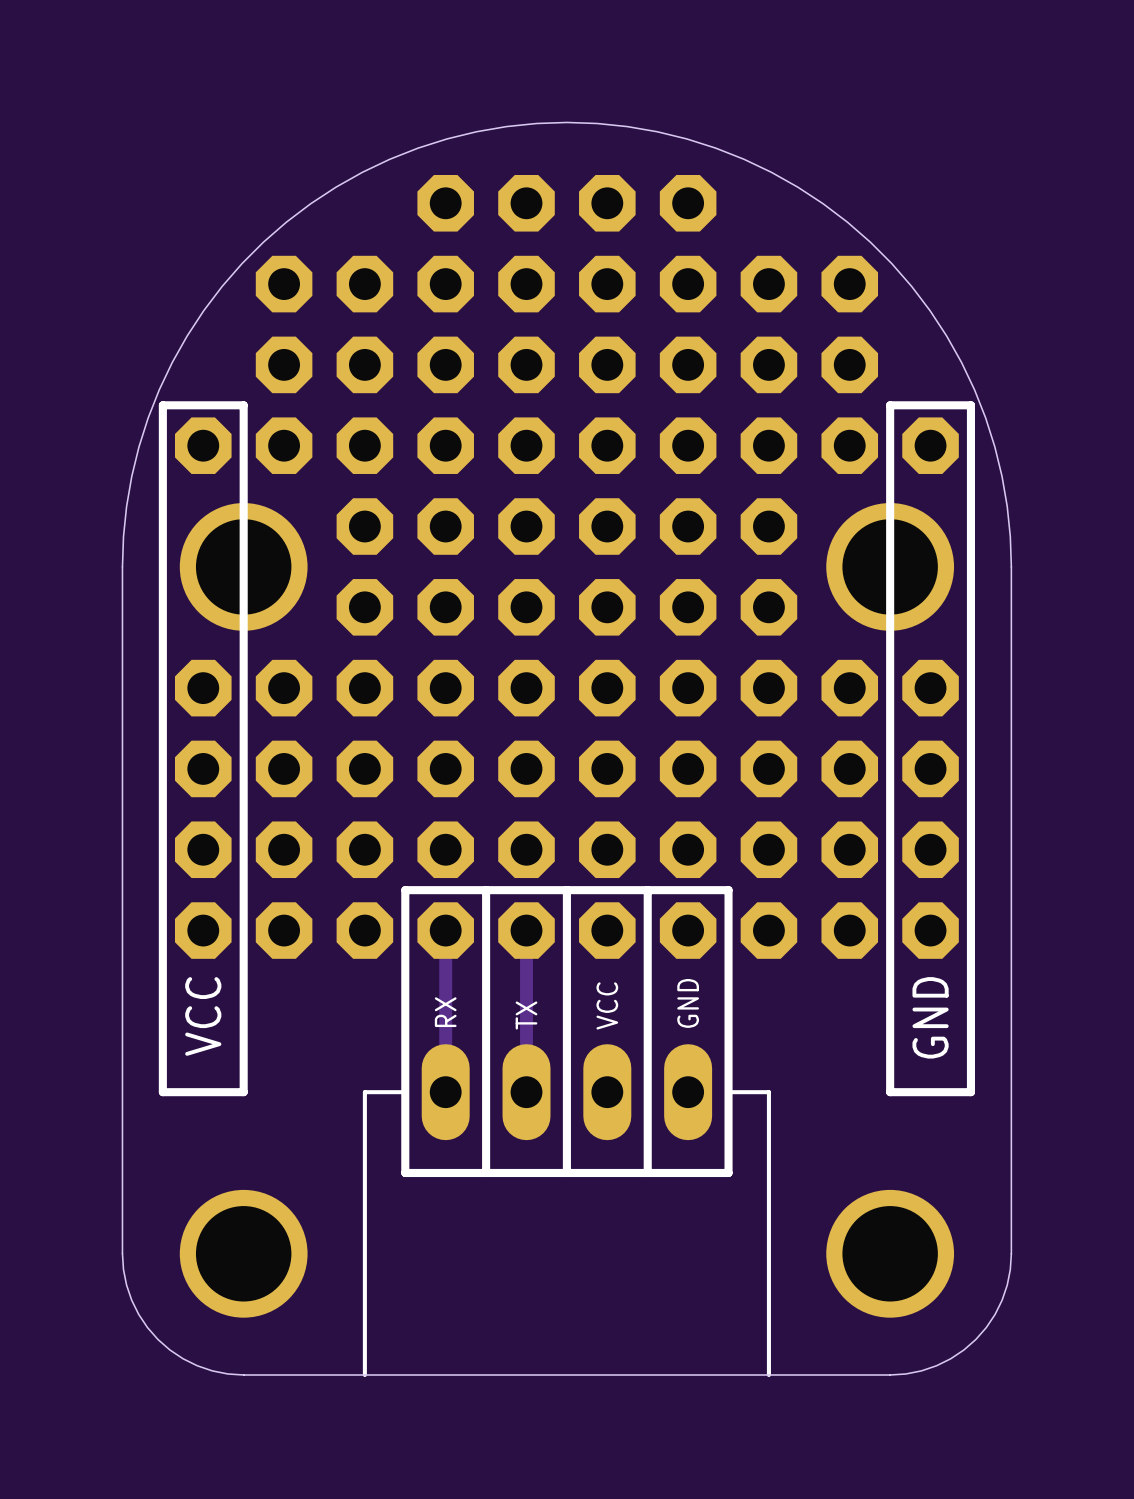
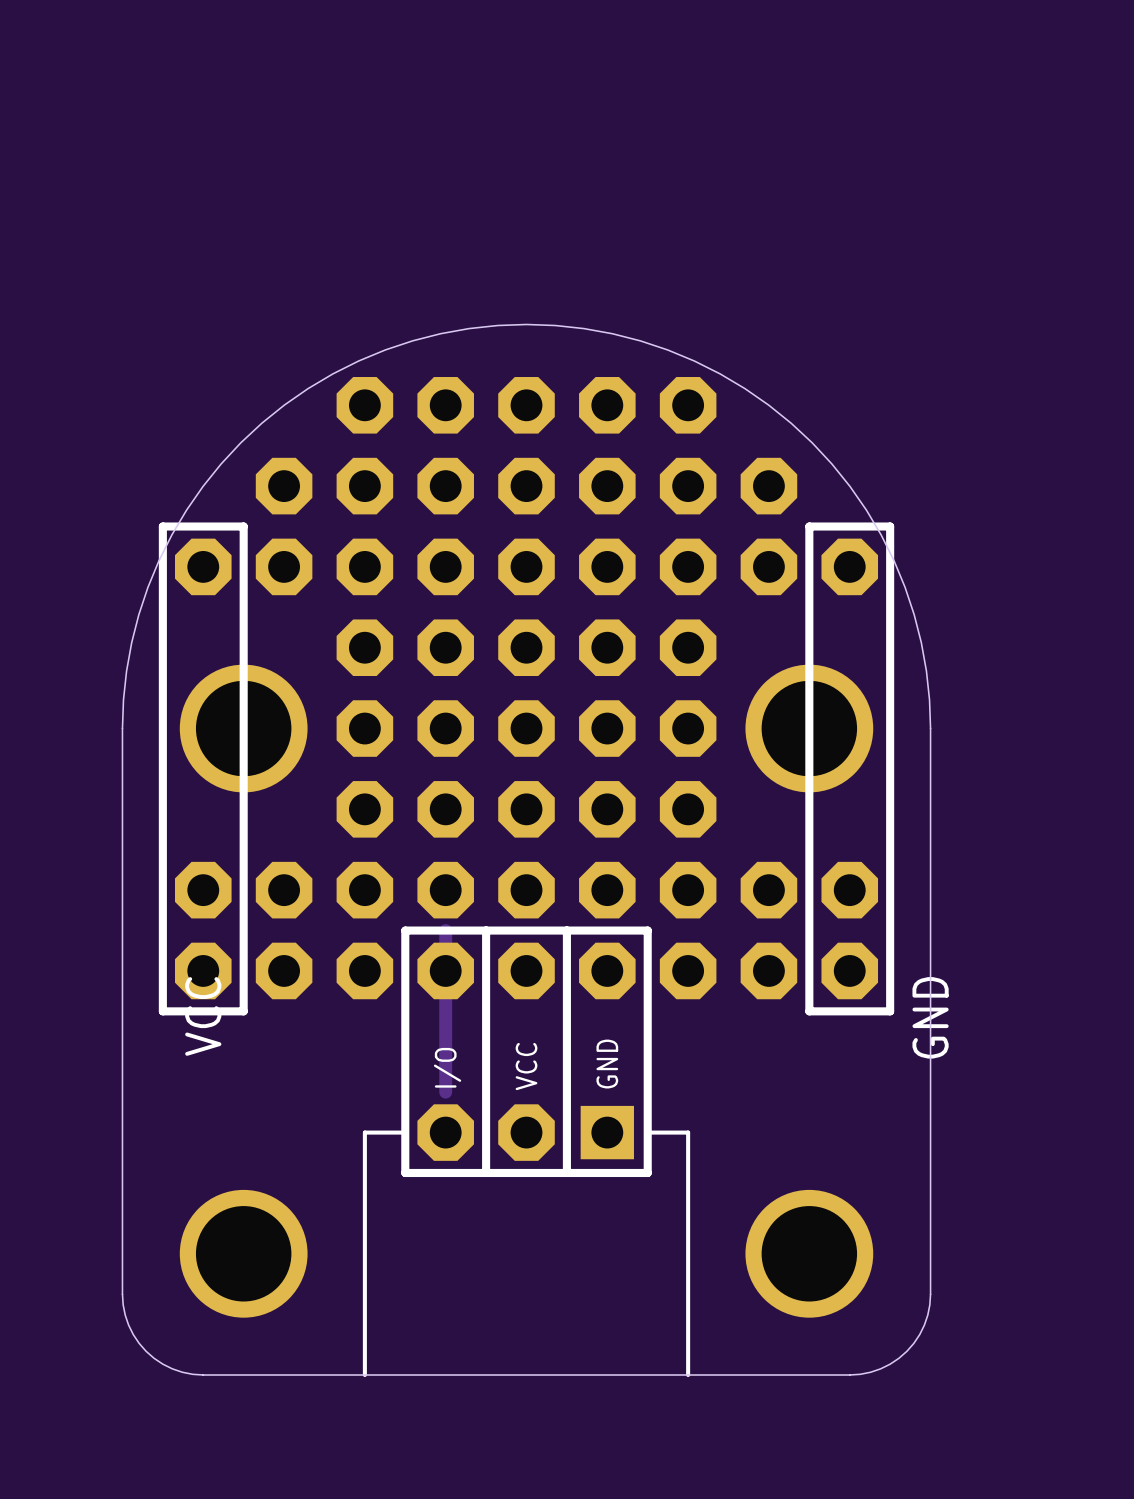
part: (203, 445) -> none
part: (930, 445) -> none
line: (162, 526) (162, 405) (243, 405) (243, 526) -> (162, 526) (243, 526)
line: (890, 526) (890, 405) (970, 405) (970, 1092) (890, 1092) (890, 1011) -> (890, 526) (809, 526) (809, 1011) (890, 1011)
part: none -> (203, 566)
part: none -> (849, 566)
part: (203, 688) -> none
part: (930, 688) -> none
part: (566, 749) -> none
part: (203, 768) -> none
part: (930, 768) -> none
part: (203, 849) -> none
part: (930, 849) -> none
part: none -> (526, 850)
part: none -> (203, 890)
line: (486, 890) (486, 930) -> none
line: (566, 890) (566, 930) -> none
line: (647, 890) (647, 930) -> none
part: none -> (849, 890)
part: (203, 930) -> none
line: (405, 930) (405, 890) (728, 890) (728, 1172) (647, 1172) -> (405, 930) (647, 930)
part position: (445, 930) -> (445, 970)
track: (526, 930) (526, 1092) -> none
part position: (526, 930) -> (526, 970)
part position: (607, 930) -> (607, 970)
part: (688, 930) -> none
part: (930, 930) -> none
part: none -> (203, 970)
part: none -> (849, 970)
line: (162, 1011) (162, 1092) (243, 1092) (243, 1011) -> (162, 1011) (243, 1011)

